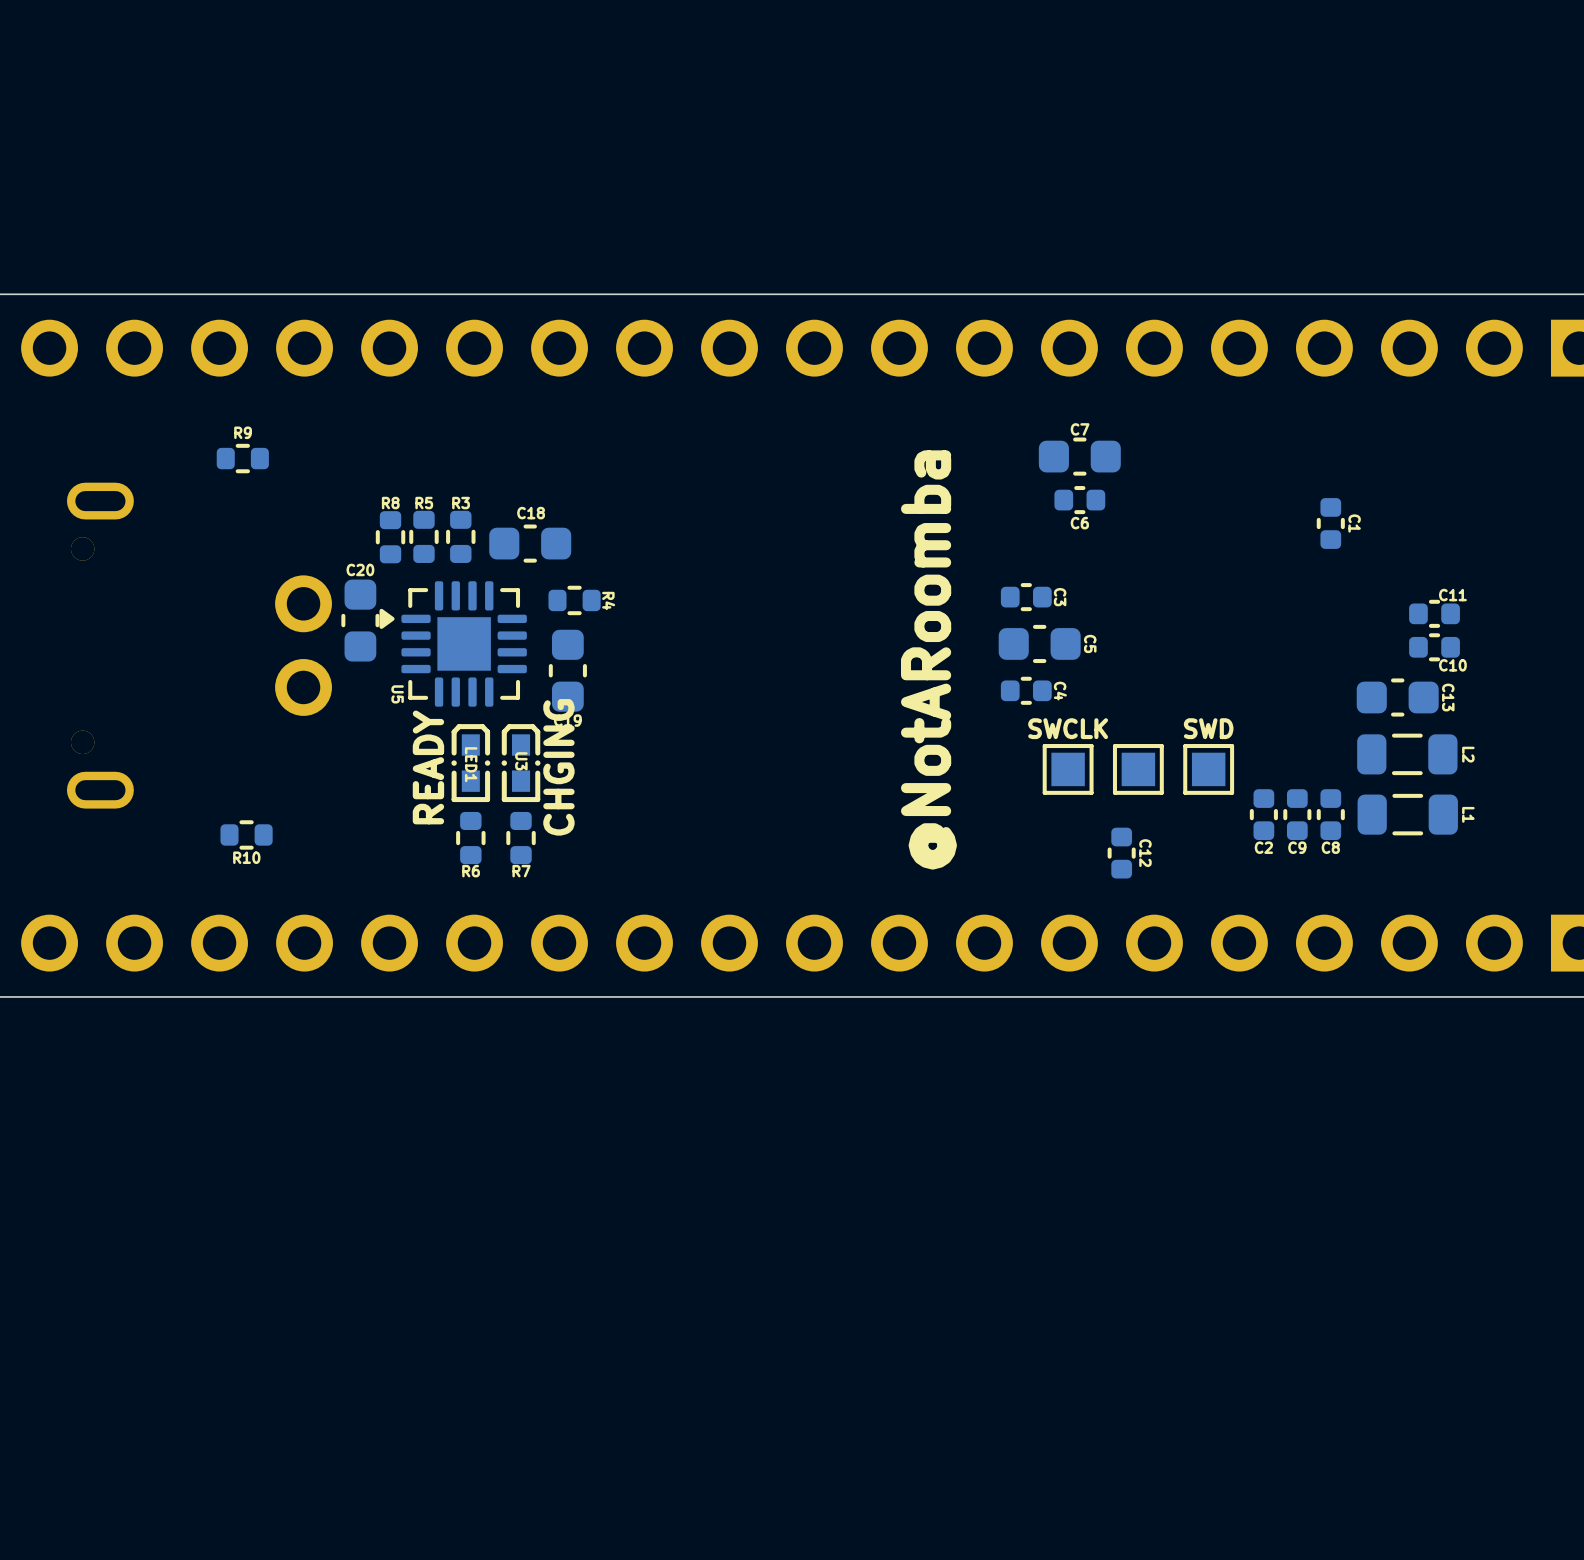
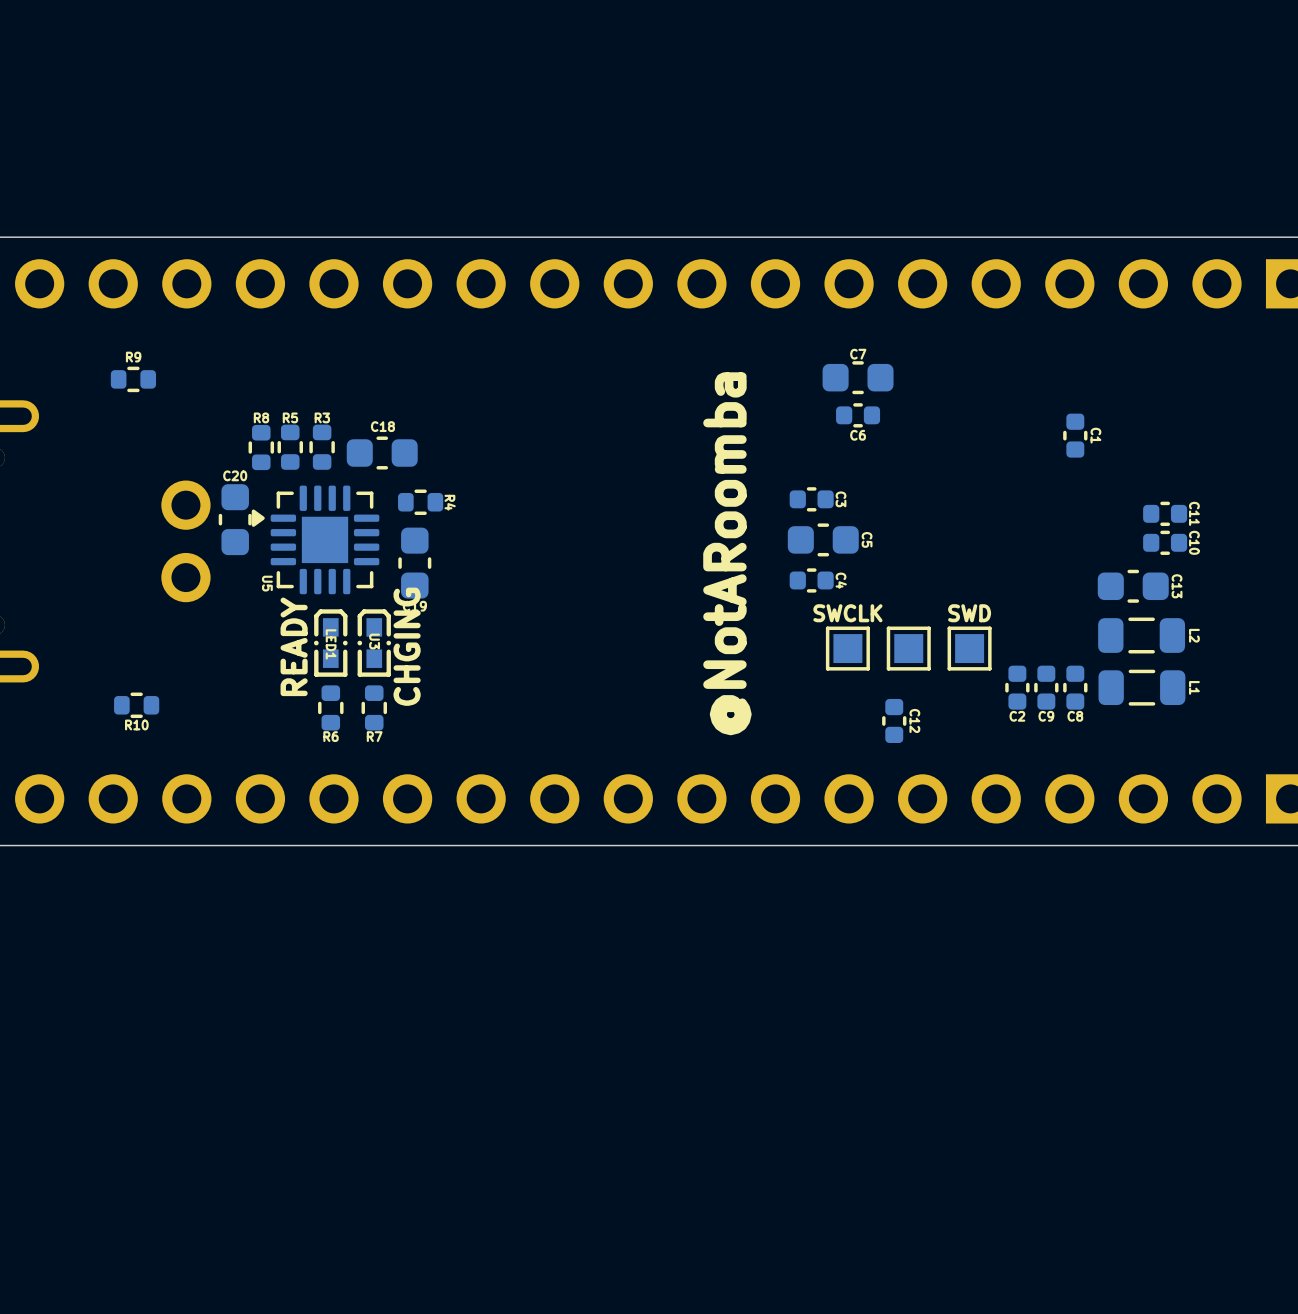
C11 name rotation: 0° (1452, 595) -> 90° clockwise (1194, 513)
C10 name rotation: 0° (1452, 665) -> 90° clockwise (1194, 542)

